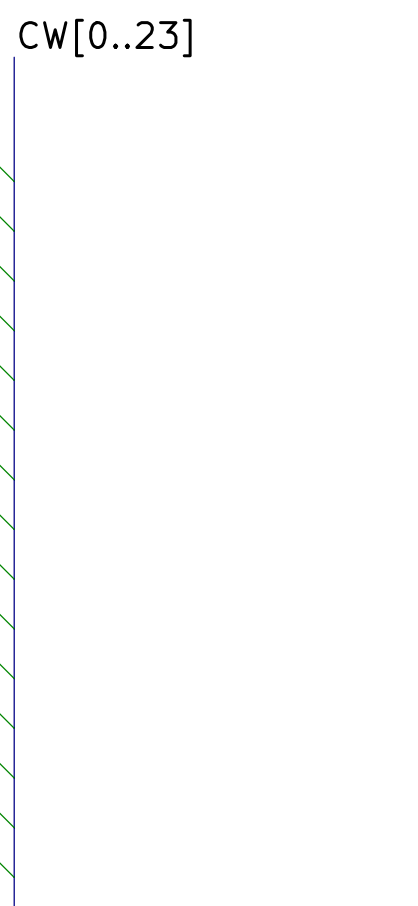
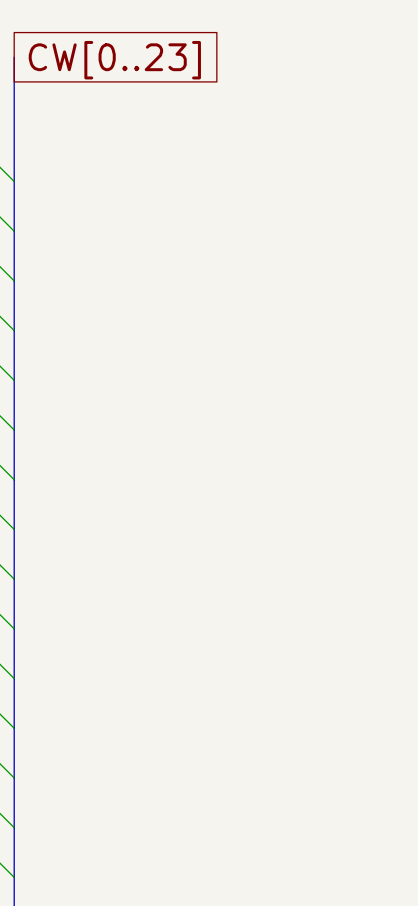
label: CW[0..23] (105, 38) -> none
global label: none -> CW[0..23] (114, 60)

